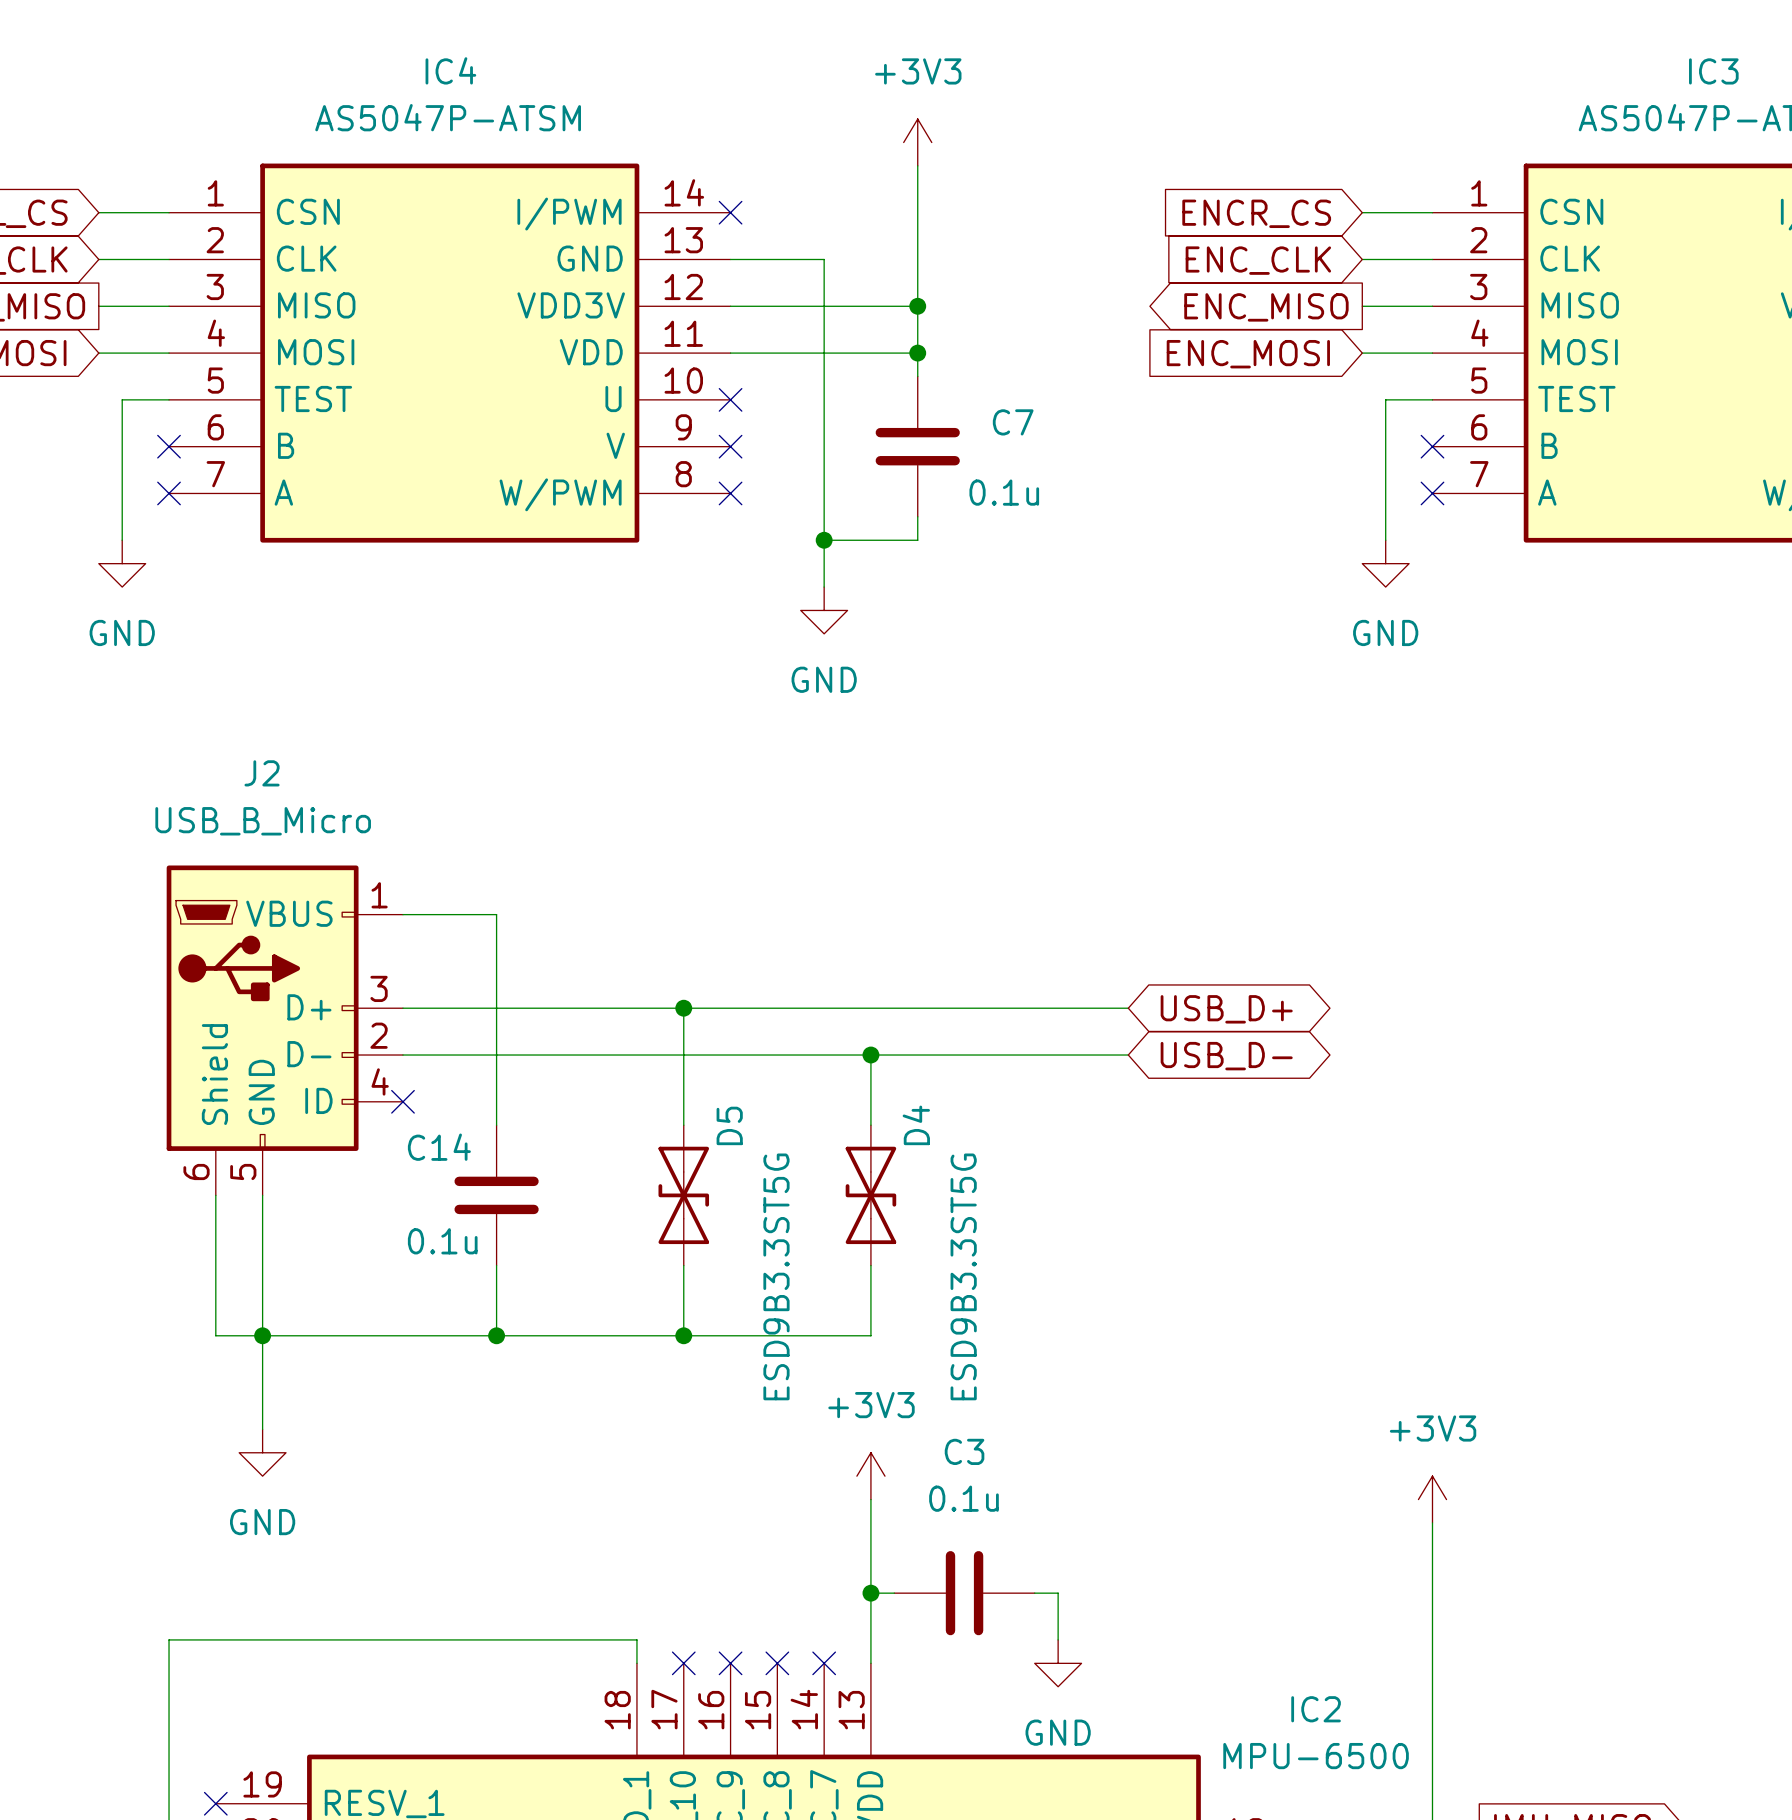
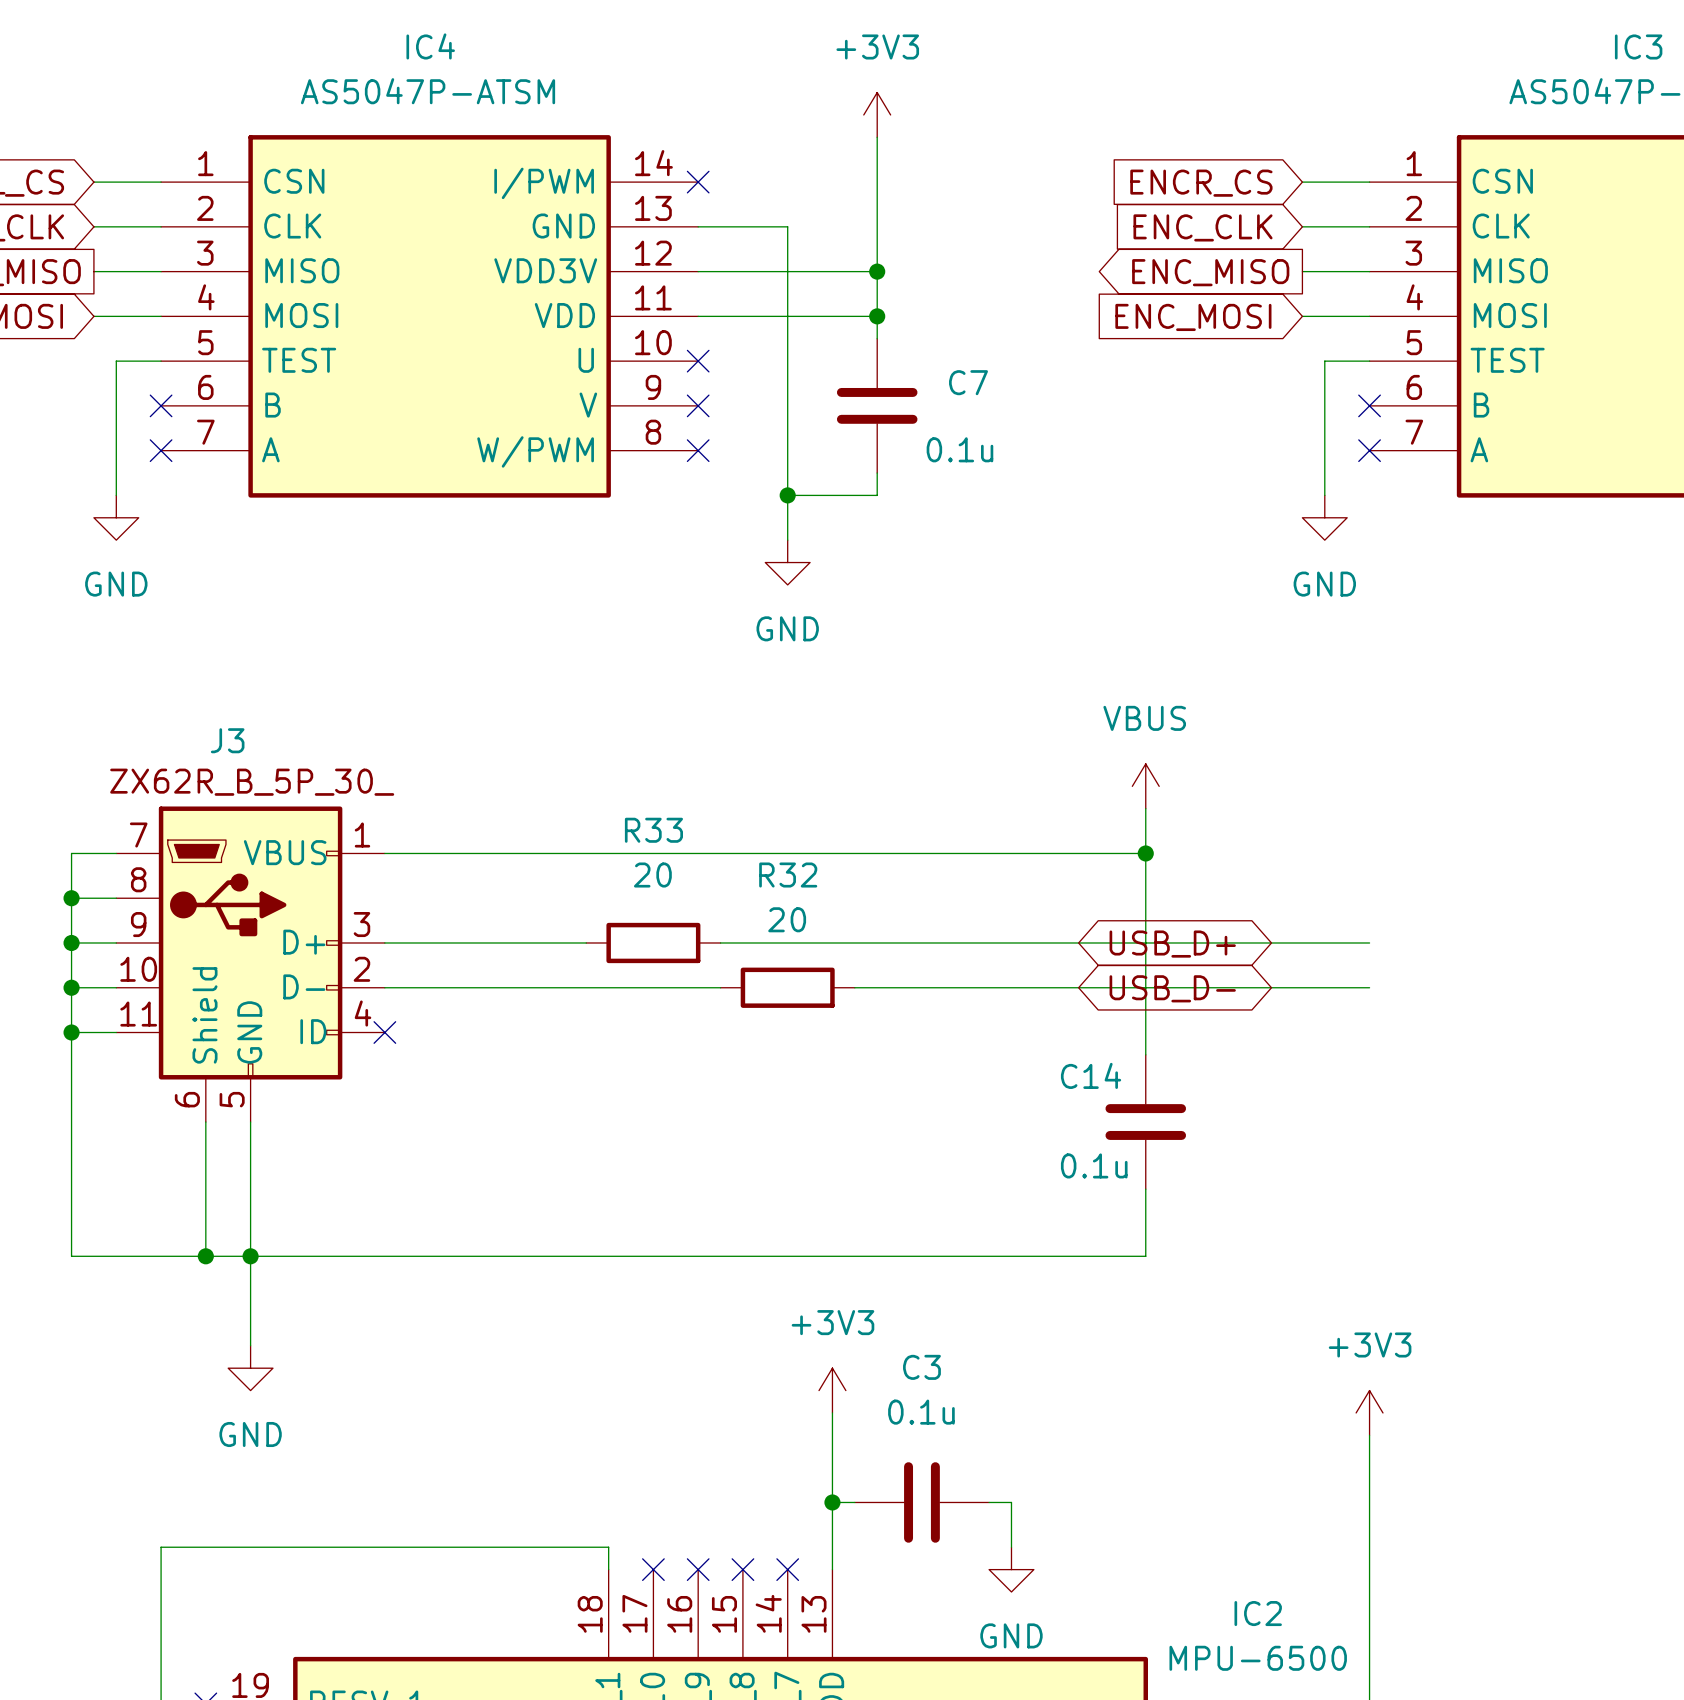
power symbol: none -> VBUS (1145, 786)
wire: none -> (1145, 808) (1145, 1054)
wire: none -> (116, 853) (71, 853) (71, 1256) (205, 1256)
wire: (496, 914) (496, 1125) -> (474, 853) (1145, 853)
junction: none -> (1145, 853)
wire: none -> (71, 898) (116, 898)
junction: none -> (71, 898)
wire: none -> (71, 942) (116, 942)
junction: none -> (71, 942)
wire: (613, 1008) (753, 1008) -> none
wire: (683, 1008) (683, 1125) -> none
junction: (683, 1008) -> none
R33: none -> 20 (653, 942)
wire: none -> (1078, 942) (1369, 942)
J3: none -> (250, 964)
J2: USB_B_Micro (284, 1030) -> none
wire: none -> (71, 987) (116, 987)
junction: none -> (71, 987)
wire: (753, 1055) (894, 1055) -> none
R32: none -> 20 (787, 987)
wire: (870, 1055) (870, 1125) -> none
junction: (870, 1055) -> none
wire: none -> (1078, 987) (1369, 987)
wire: none -> (71, 1032) (116, 1032)
junction: none -> (71, 1032)
C14 position: (496, 1195) -> (1145, 1122)
D5: ESD9B3.3ST5G (683, 1195) -> none
D4: ESD9B3.3ST5G (870, 1195) -> none
wire: (496, 1265) (496, 1335) -> none
wire: (683, 1265) (683, 1335) -> none
wire: (870, 1265) (870, 1335) -> (1145, 1189) (1145, 1256) (832, 1256)
junction: none -> (205, 1256)
junction: (496, 1335) -> none
junction: (683, 1335) -> none

